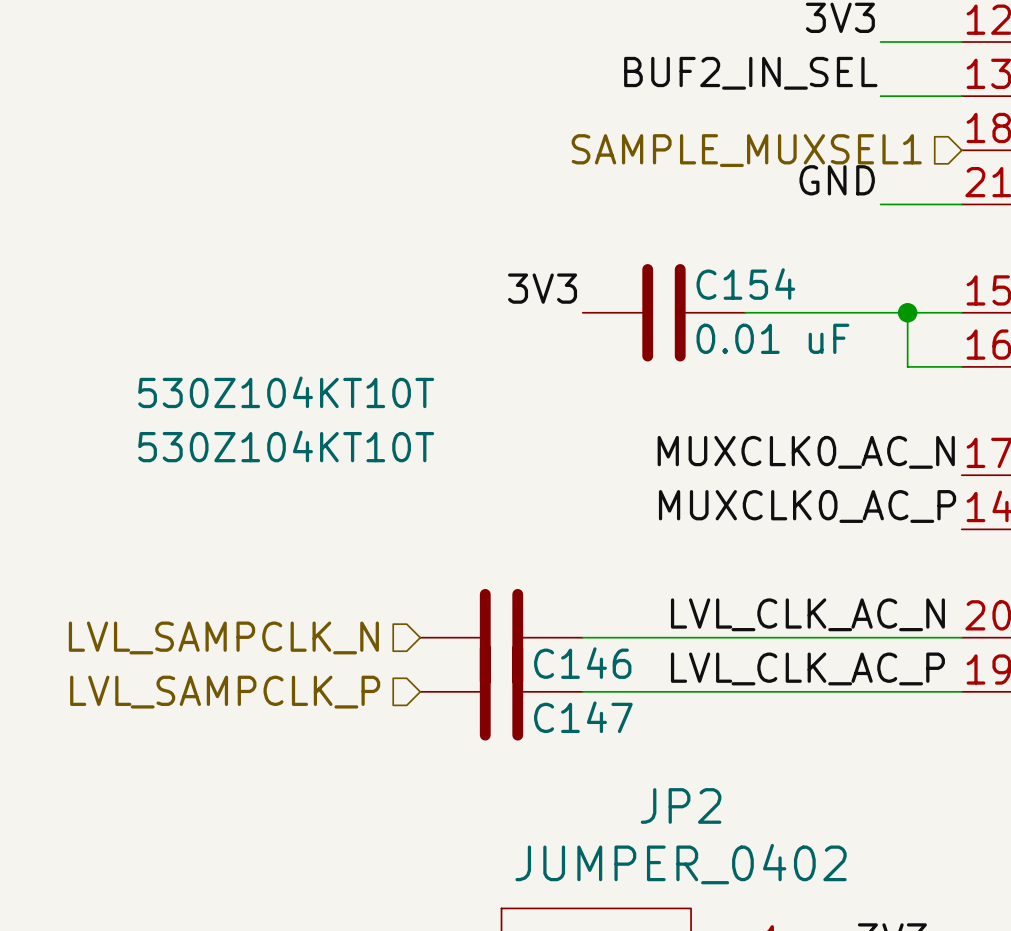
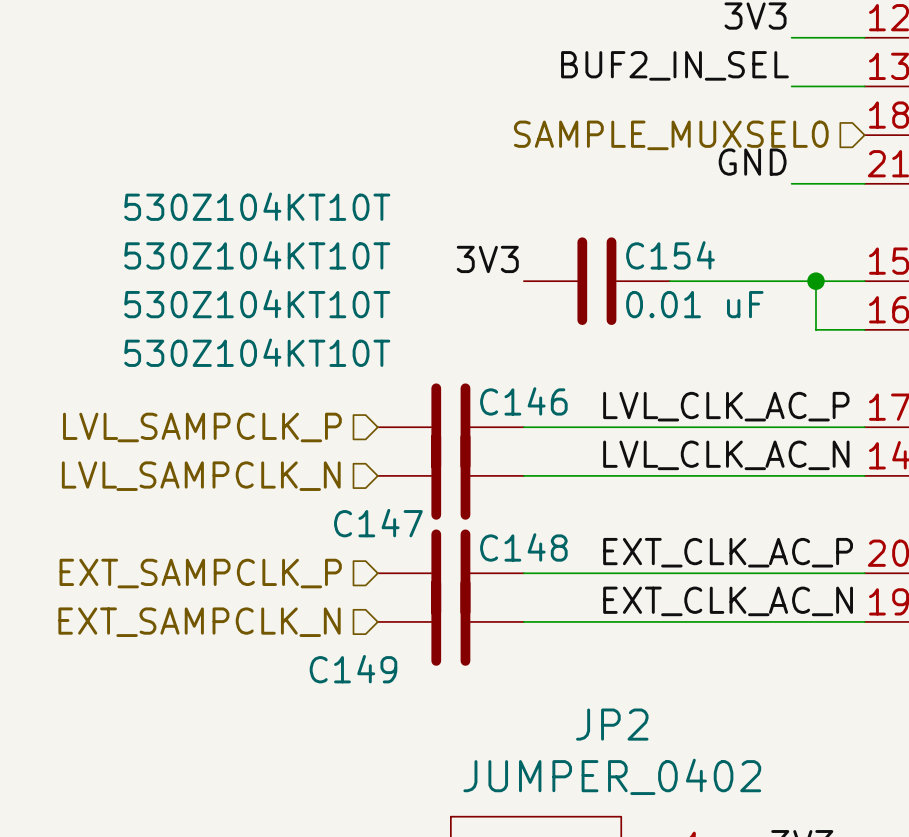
hierarchical label: SAMPLE_MUXSEL1 (746, 150) -> SAMPLE_MUXSEL0 (671, 135)
C147 value position: 530Z104KT10T (286, 392) -> 530Z104KT10T (257, 304)
C146 value position: 530Z104KT10T (286, 446) -> 530Z104KT10T (257, 352)
label: MUXCLK0_AC_N (806, 452) -> LVL_CLK_AC_N (726, 455)
hierarchical label: none -> LVL_SAMPCLK_P (202, 427)
C146: none -> 530Z104KT10T (450, 427)
wire: none -> (523, 427) (864, 427)
label: MUXCLK0_AC_P (807, 506) -> LVL_CLK_AC_P (726, 406)
hierarchical label: none -> LVL_SAMPCLK_N (201, 476)
C147: none -> 530Z104KT10T (450, 475)
wire: none -> (523, 475) (864, 475)
label: LVL_CLK_AC_N (807, 614) -> EXT_CLK_AC_P (728, 552)
hierarchical label: LVL_SAMPCLK_N (223, 637) -> EXT_SAMPCLK_P (200, 573)
C146 name: C146 (582, 663) -> C149 (353, 669)
label: LVL_CLK_AC_P (807, 668) -> EXT_CLK_AC_N (728, 601)
hierarchical label: LVL_SAMPCLK_P (225, 692) -> EXT_SAMPCLK_N (199, 622)
C147 name: C147 (583, 717) -> C148 (523, 547)

